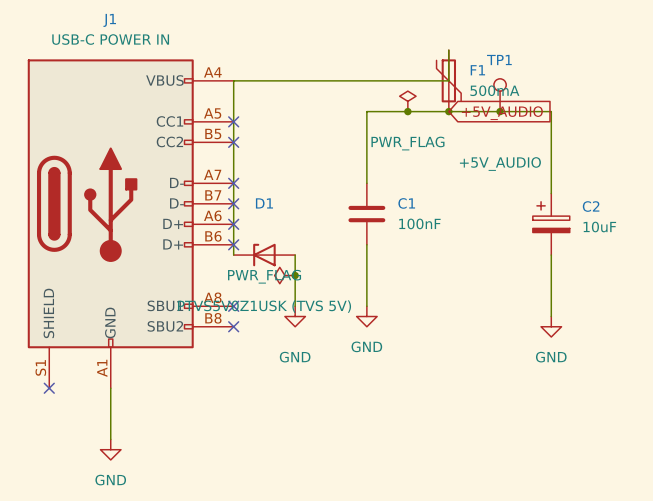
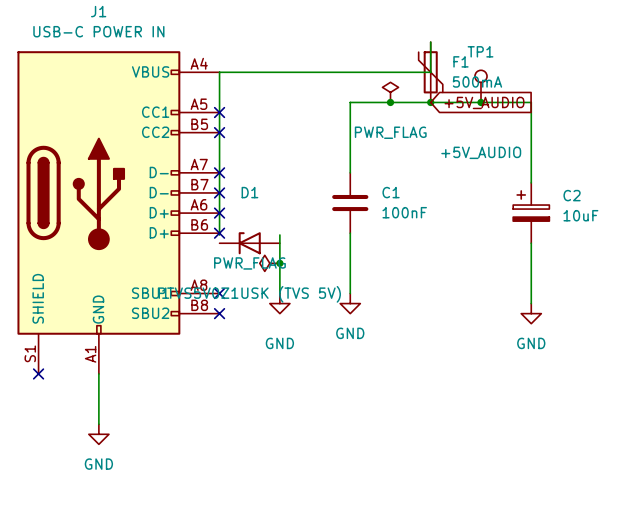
wire: (233, 246) (233, 255) -> (279, 235) (279, 243)

